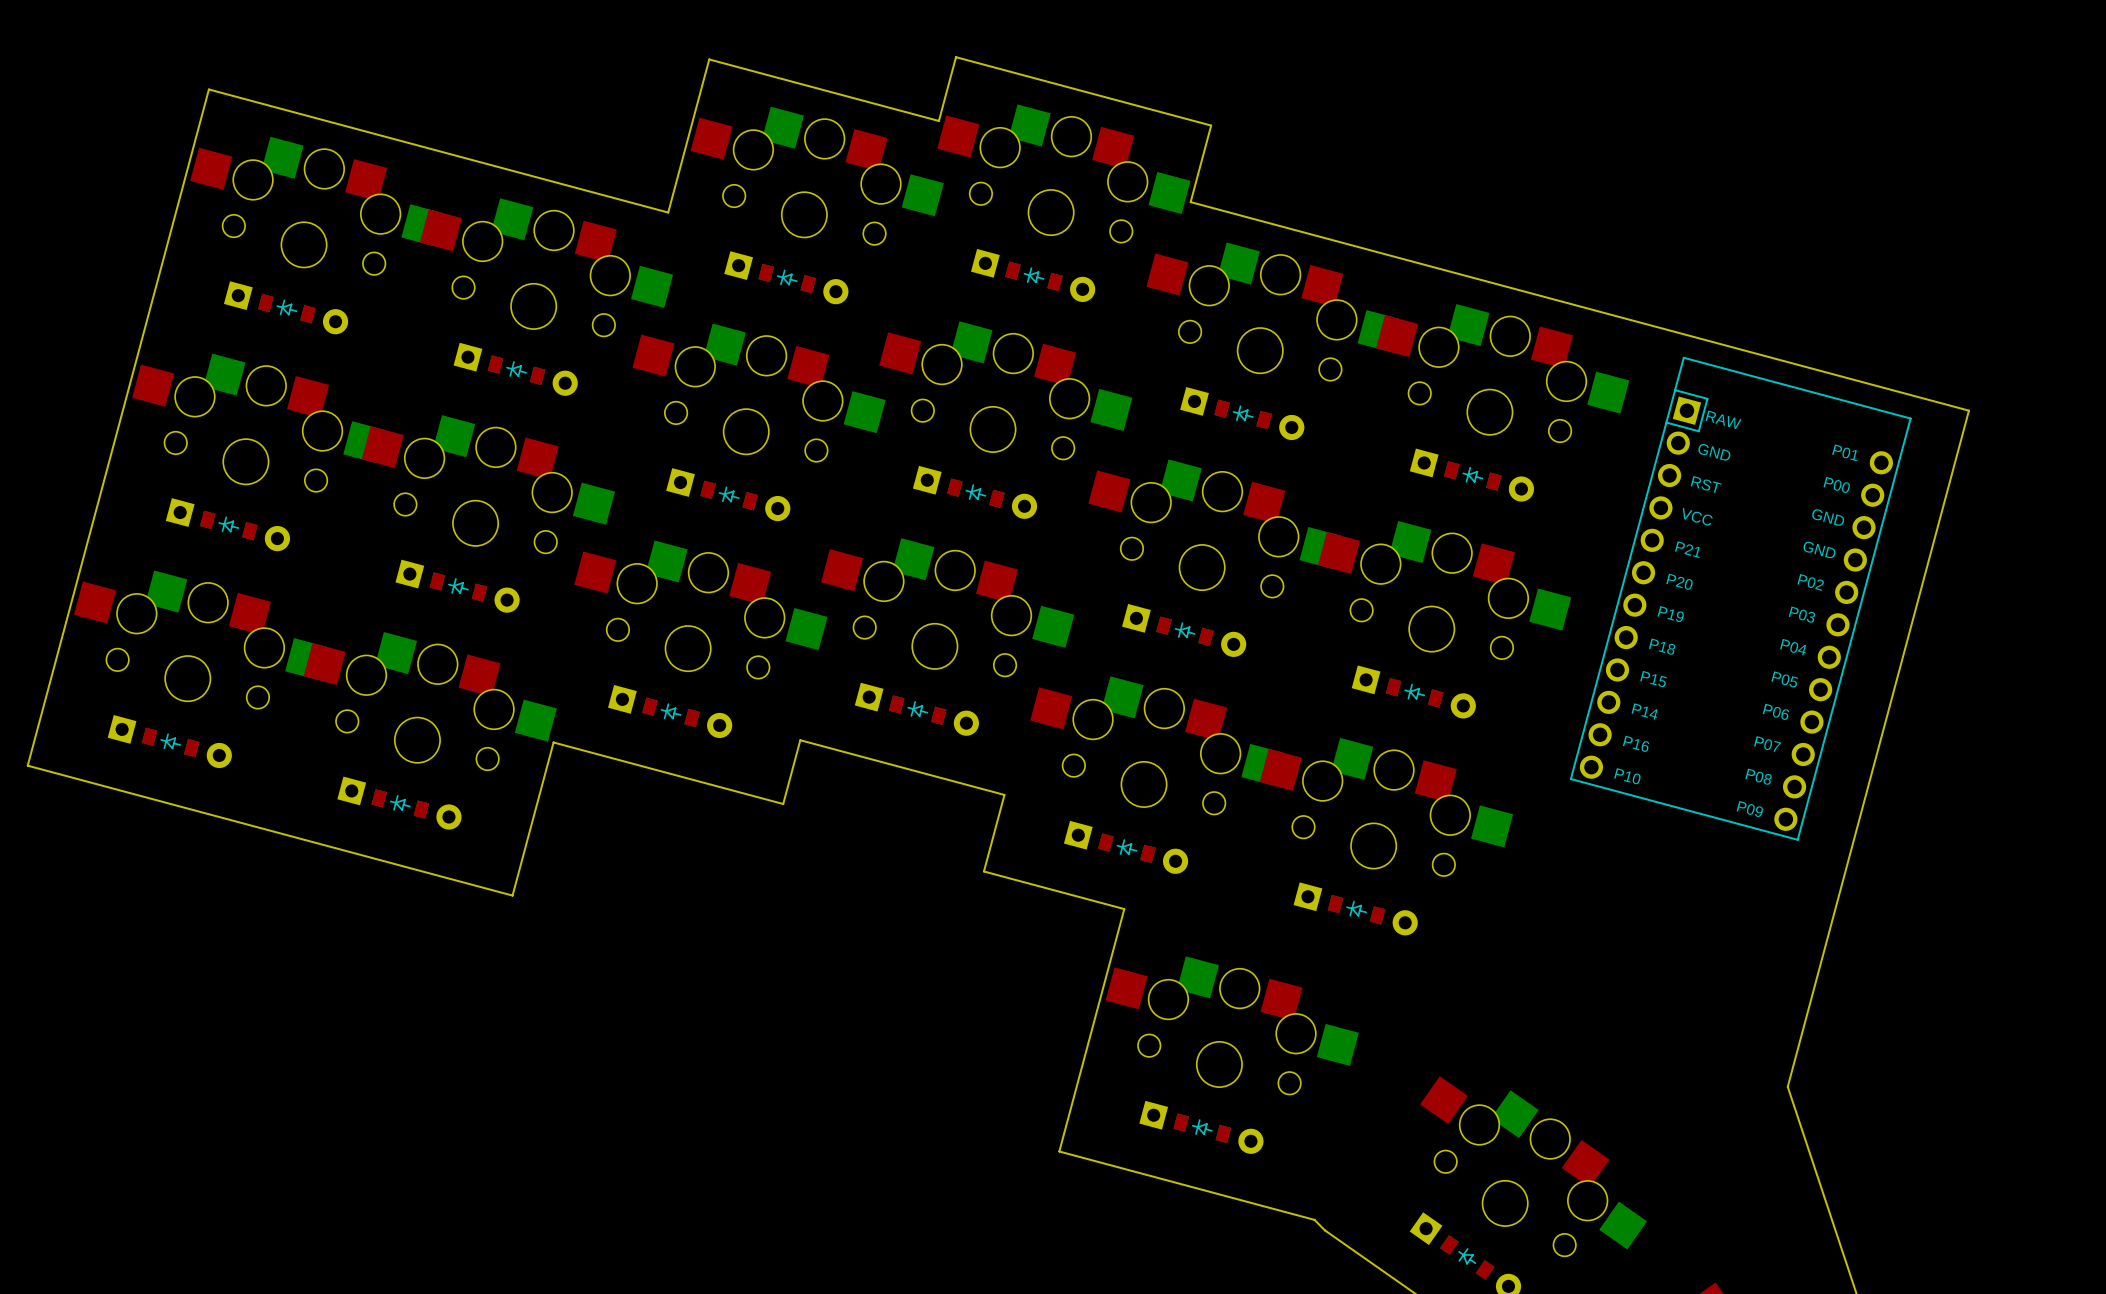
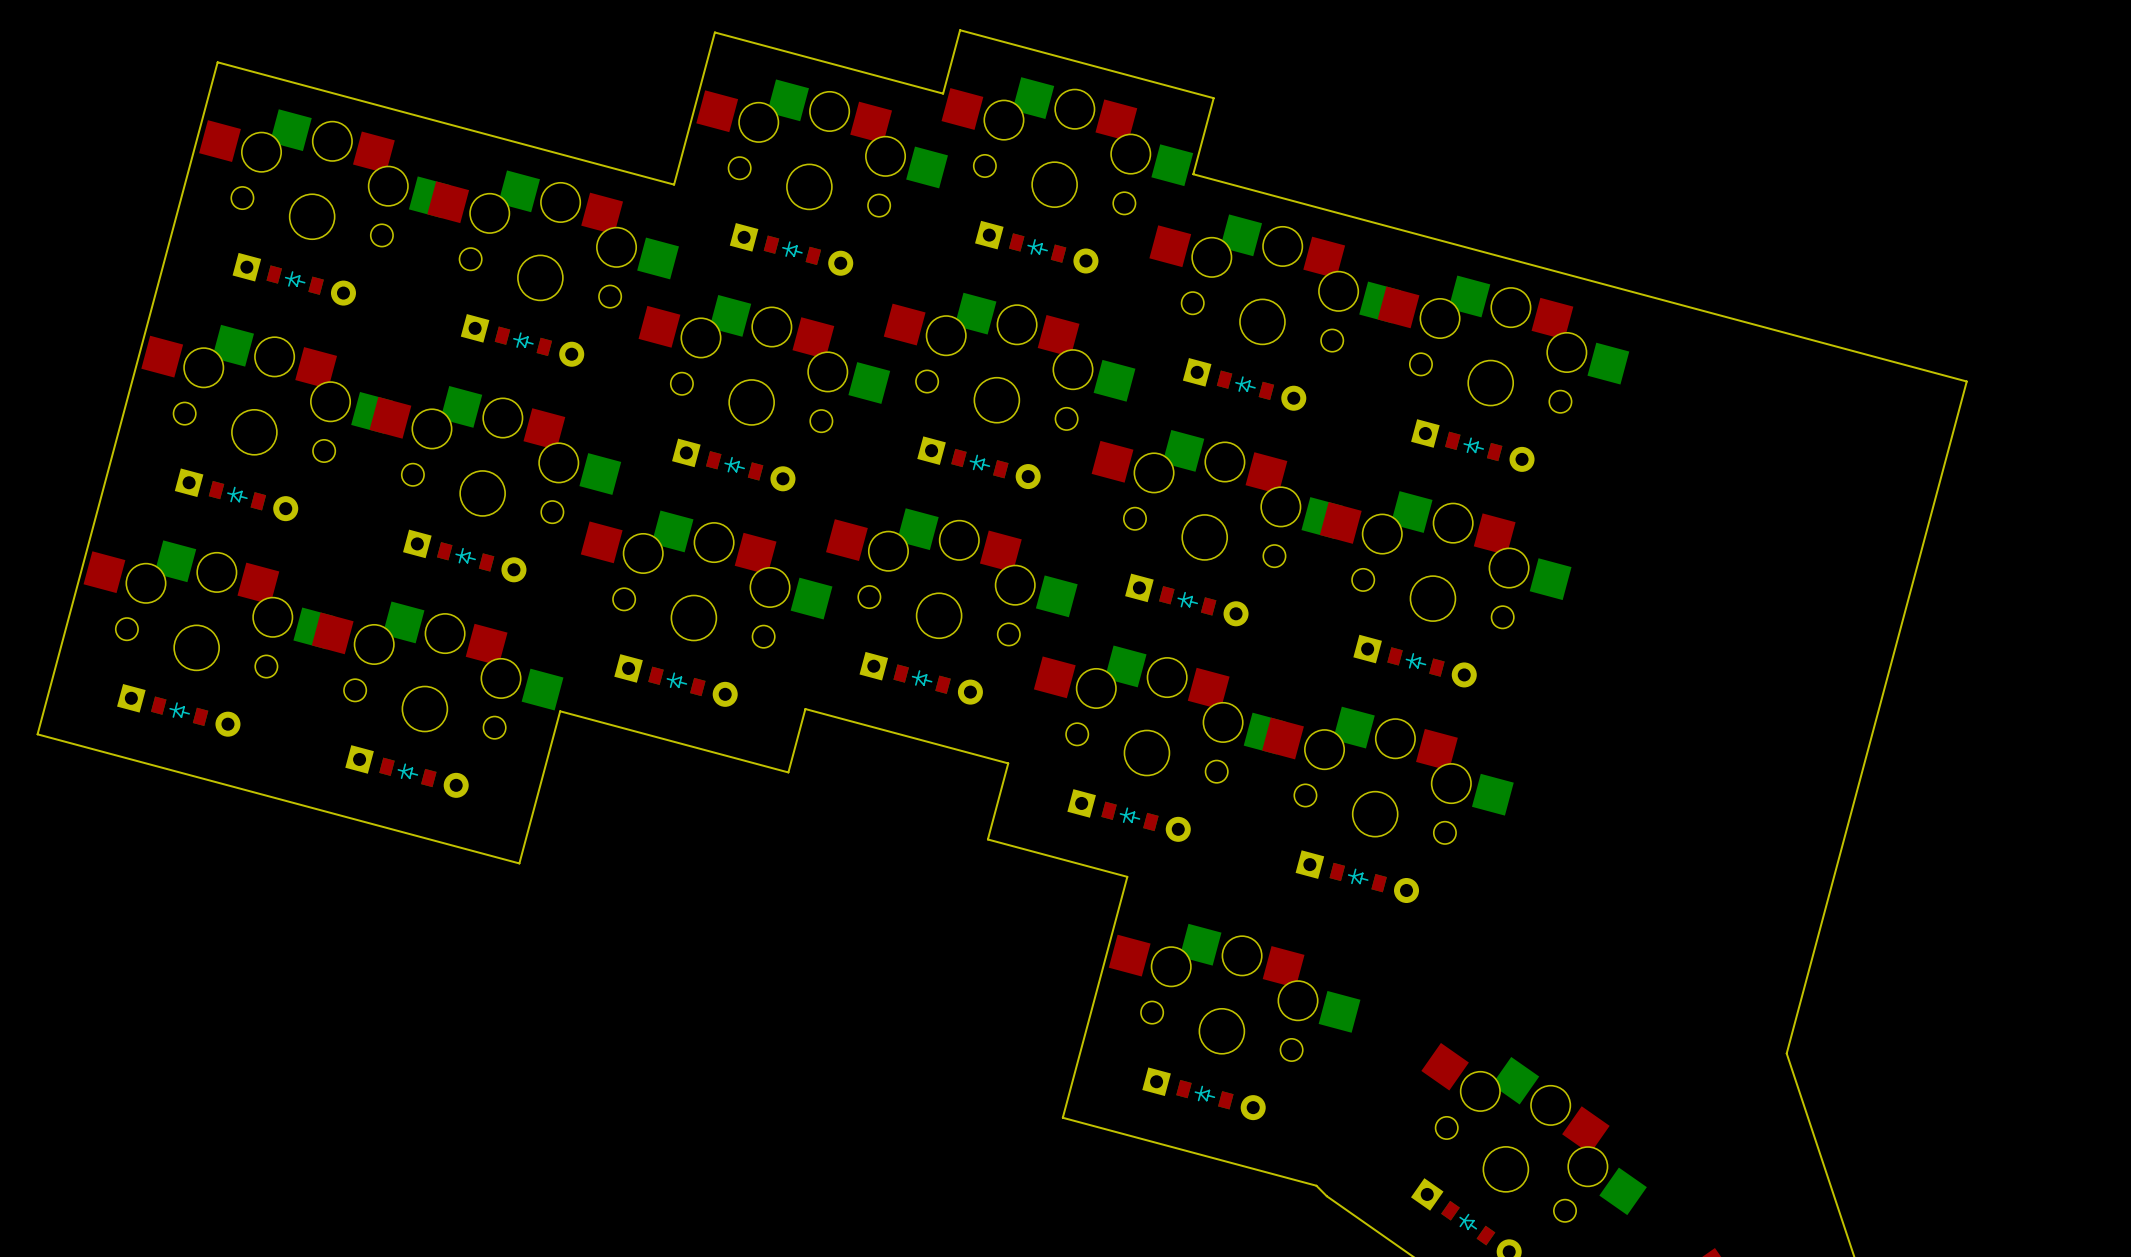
part: (1740, 598) -> none

